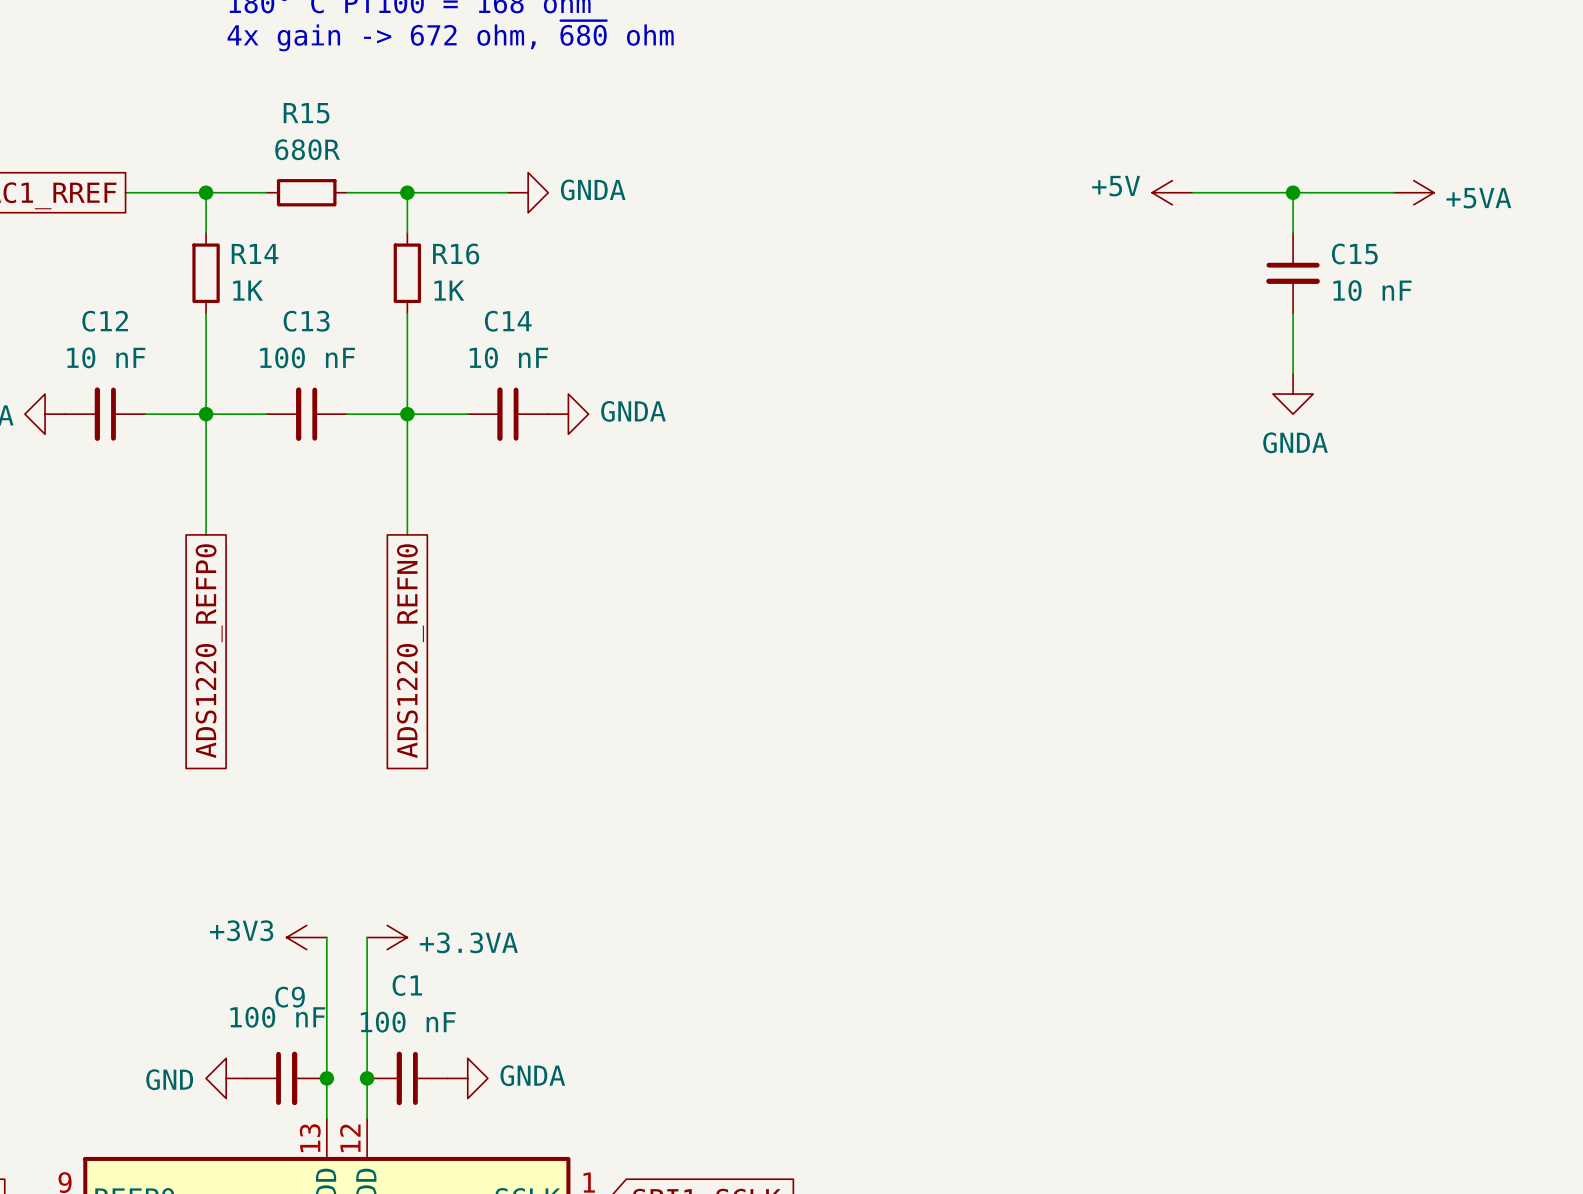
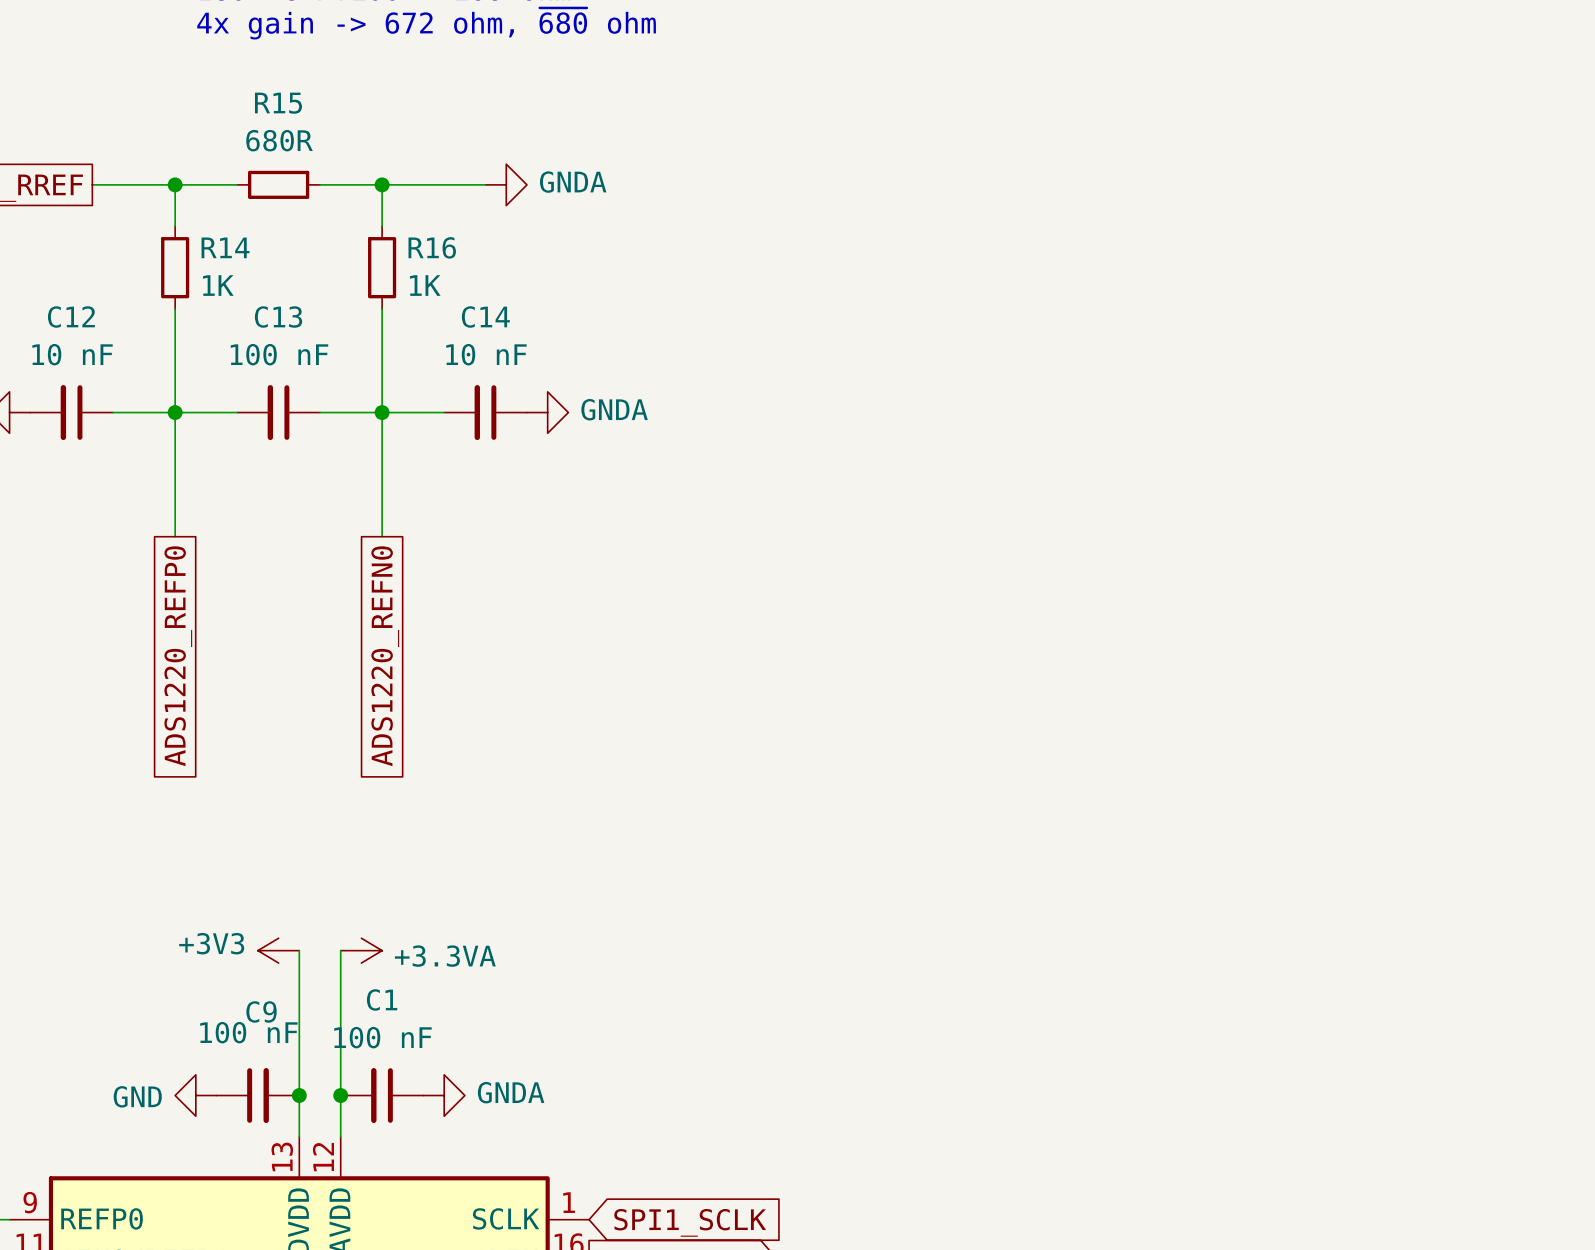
power symbol: +5V (1172, 192) -> none
wire: (1192, 192) (1393, 192) -> none
wire: (1293, 192) (1293, 232) -> none
junction: (1293, 192) -> none
power symbol: +5VA (1413, 192) -> none
C15: 10 nF (1293, 273) -> none
wire: (1293, 313) (1293, 373) -> none
power symbol: GNDA (1293, 394) -> none

